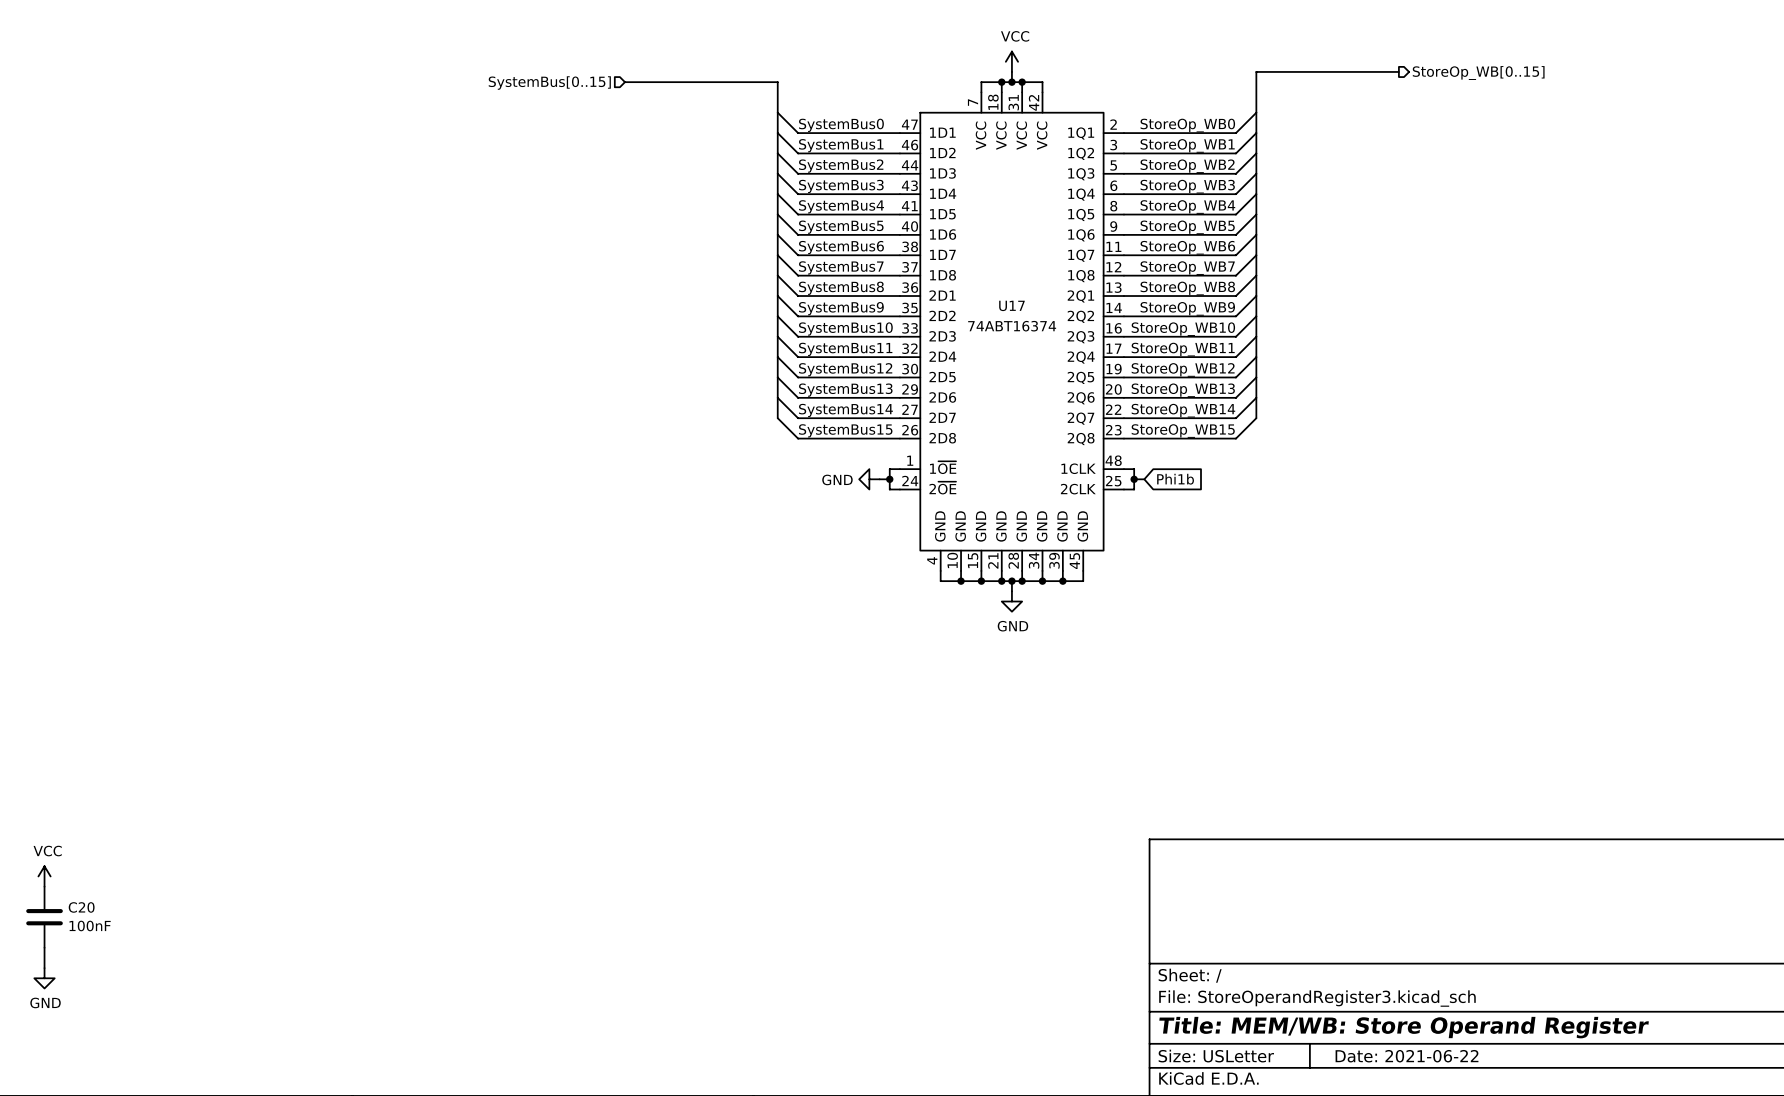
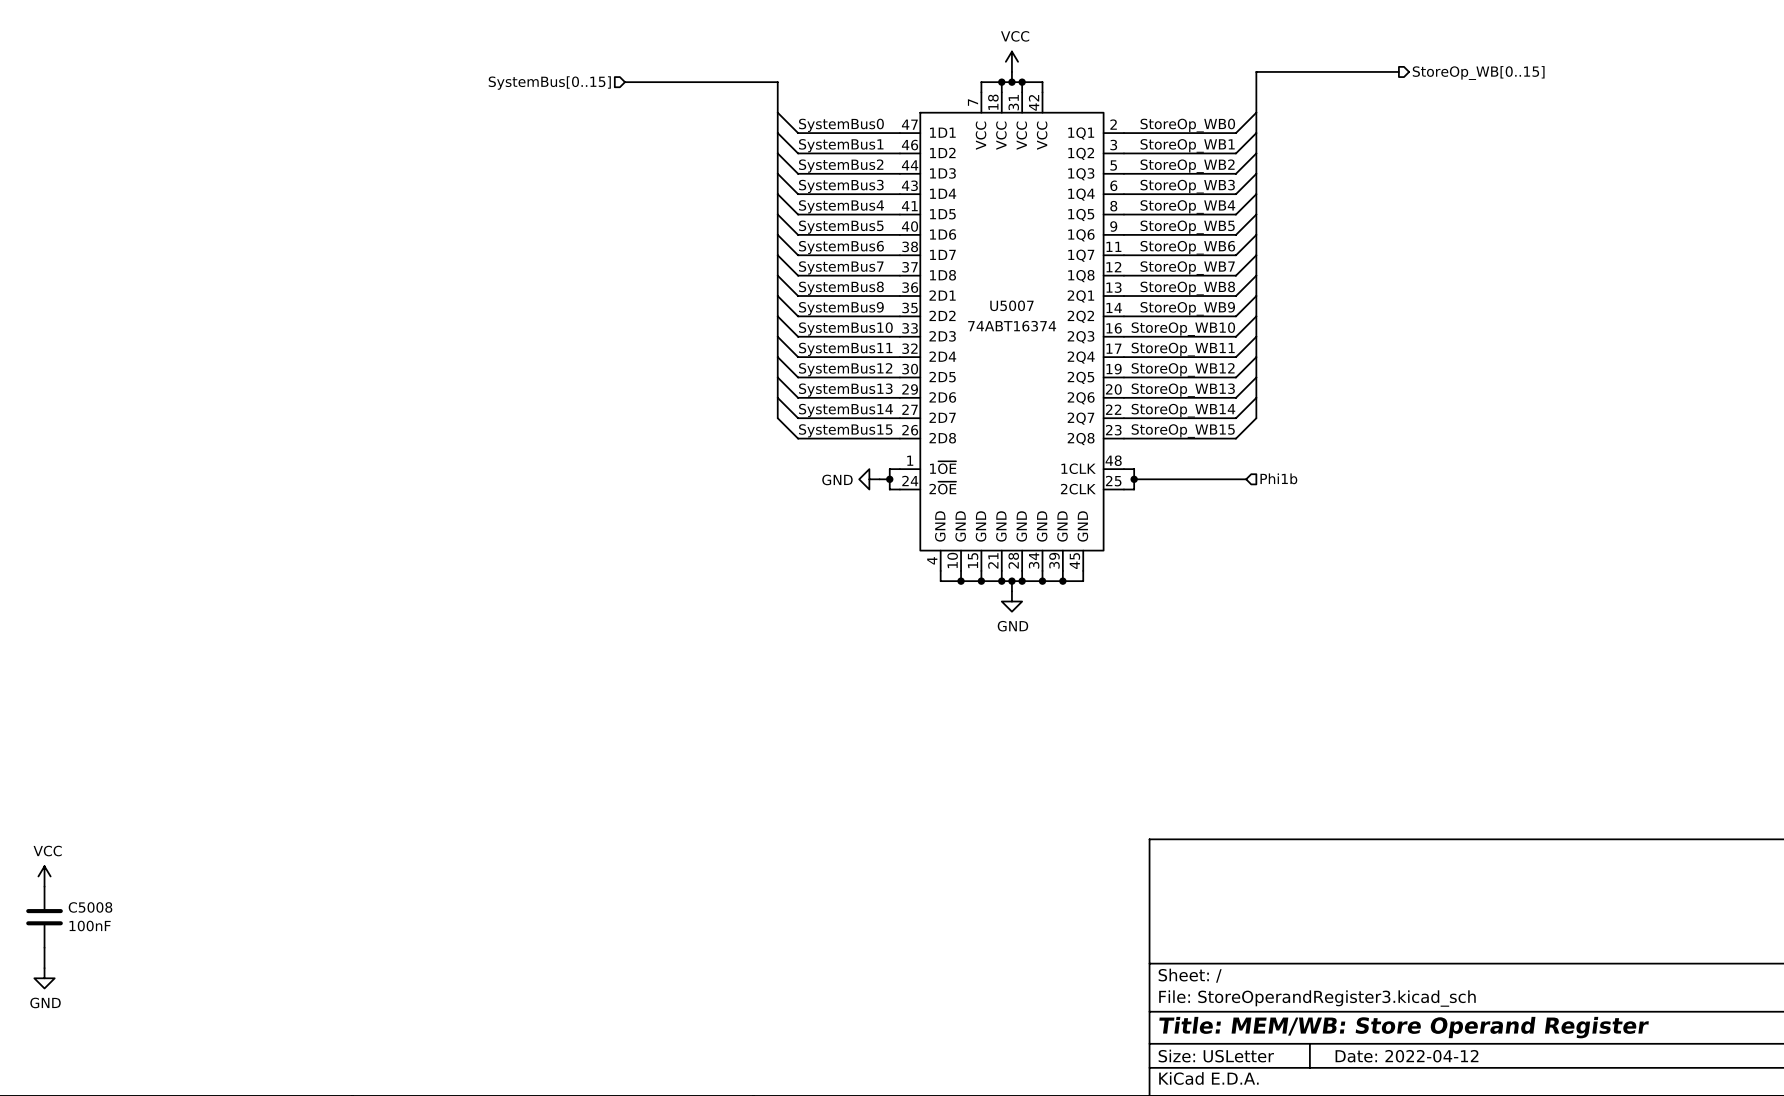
U17 name: U17 (1011, 305) -> U5007 (1011, 305)
hierarchical label: none -> Phi1b (1278, 478)
wire: none -> (1144, 479) (1246, 479)
global label: Phi1b (1175, 479) -> none
C20 name: C20 (81, 907) -> C5008 (90, 907)
title block: Date: 2021-06-22 (1407, 1056) -> Date: 2022-04-12 (1407, 1056)

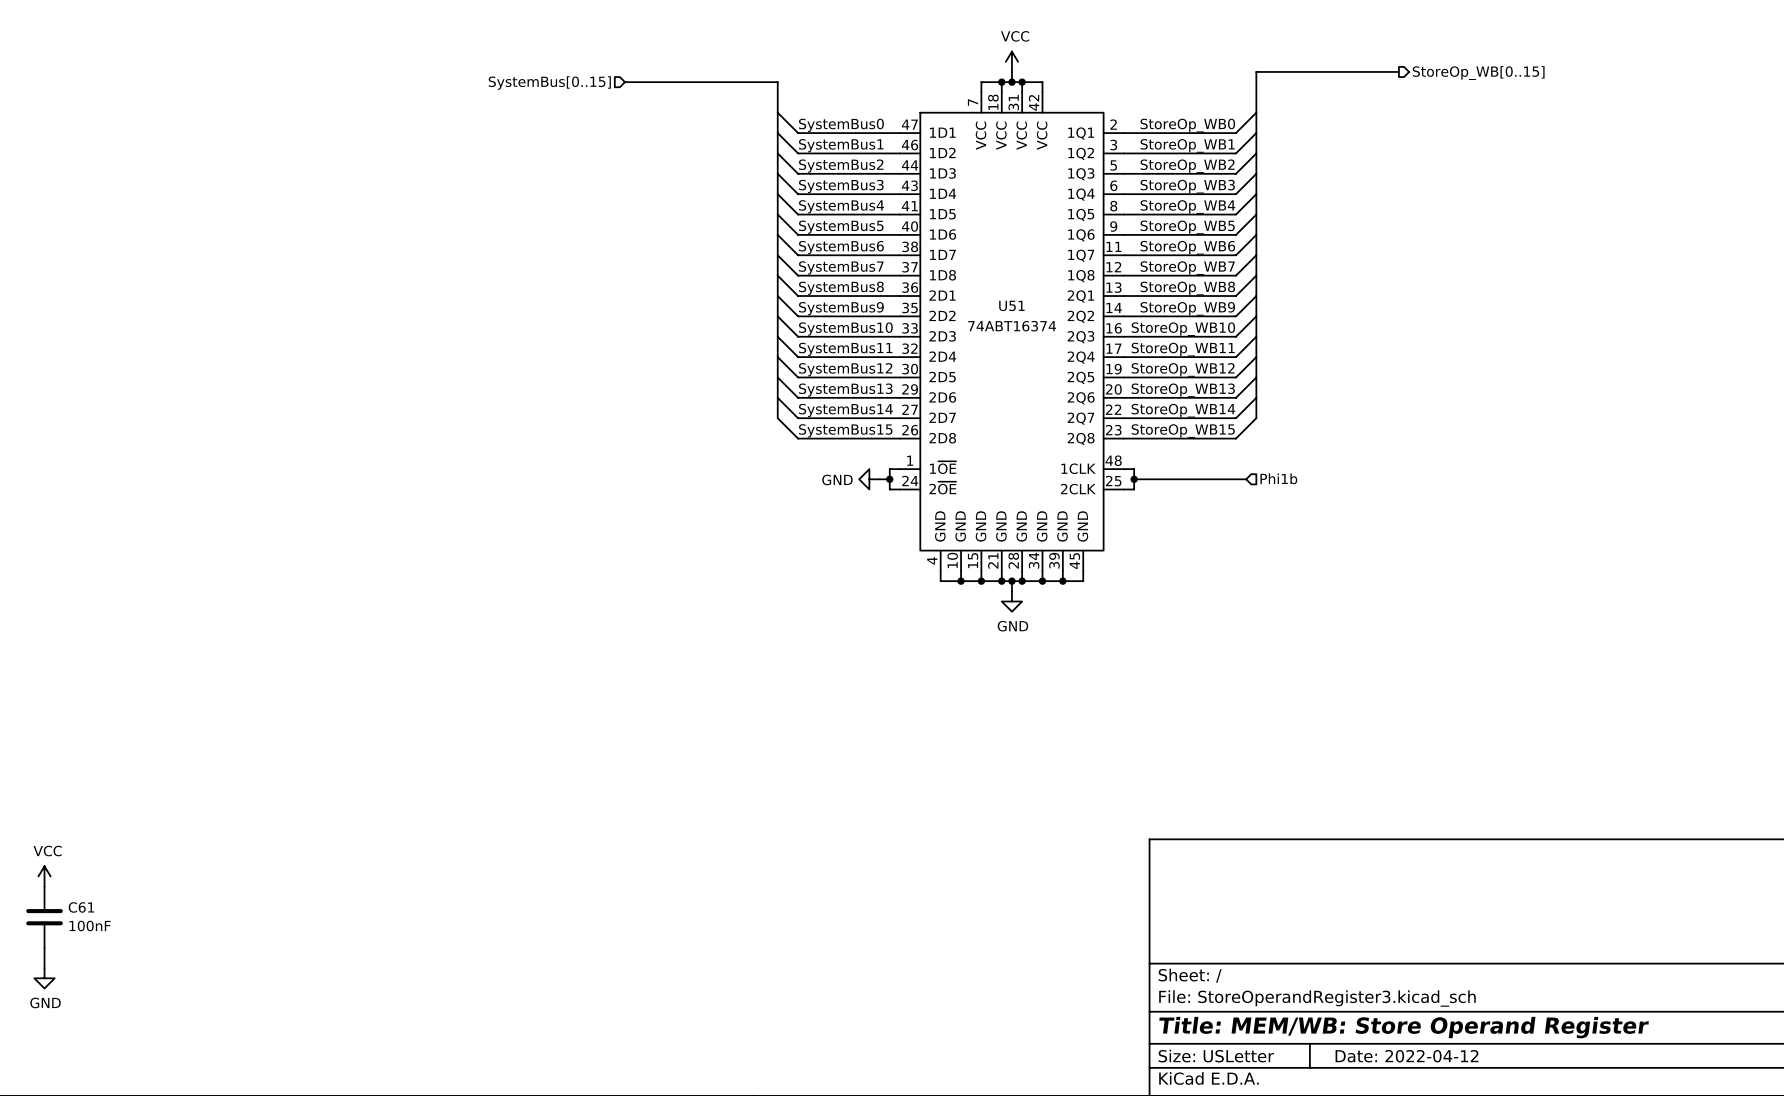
U5007 name: U5007 (1011, 305) -> U51 (1011, 305)
C5008 name: C5008 (90, 907) -> C61 (81, 907)

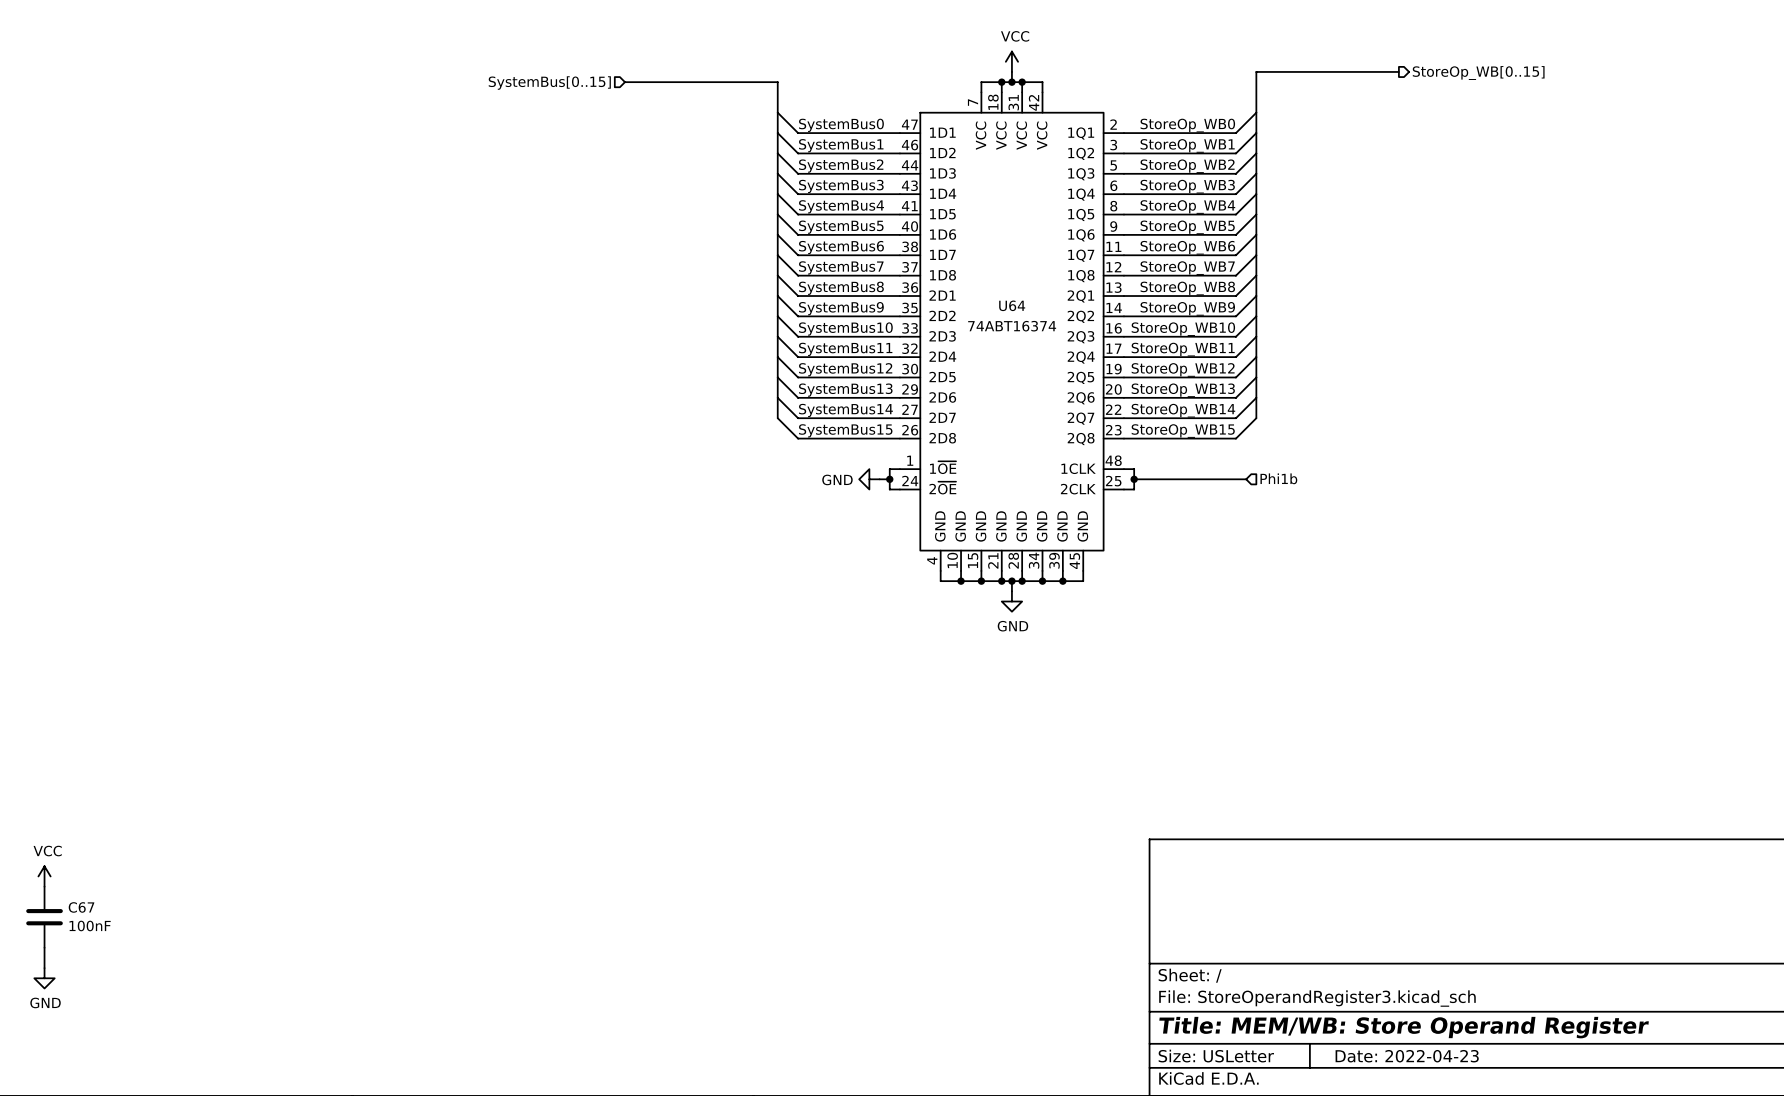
U51 name: U51 (1011, 305) -> U64 (1012, 305)
C61 name: C61 (81, 907) -> C67 (81, 907)
title block: Date: 2022-04-12 (1407, 1056) -> Date: 2022-04-23 (1407, 1056)

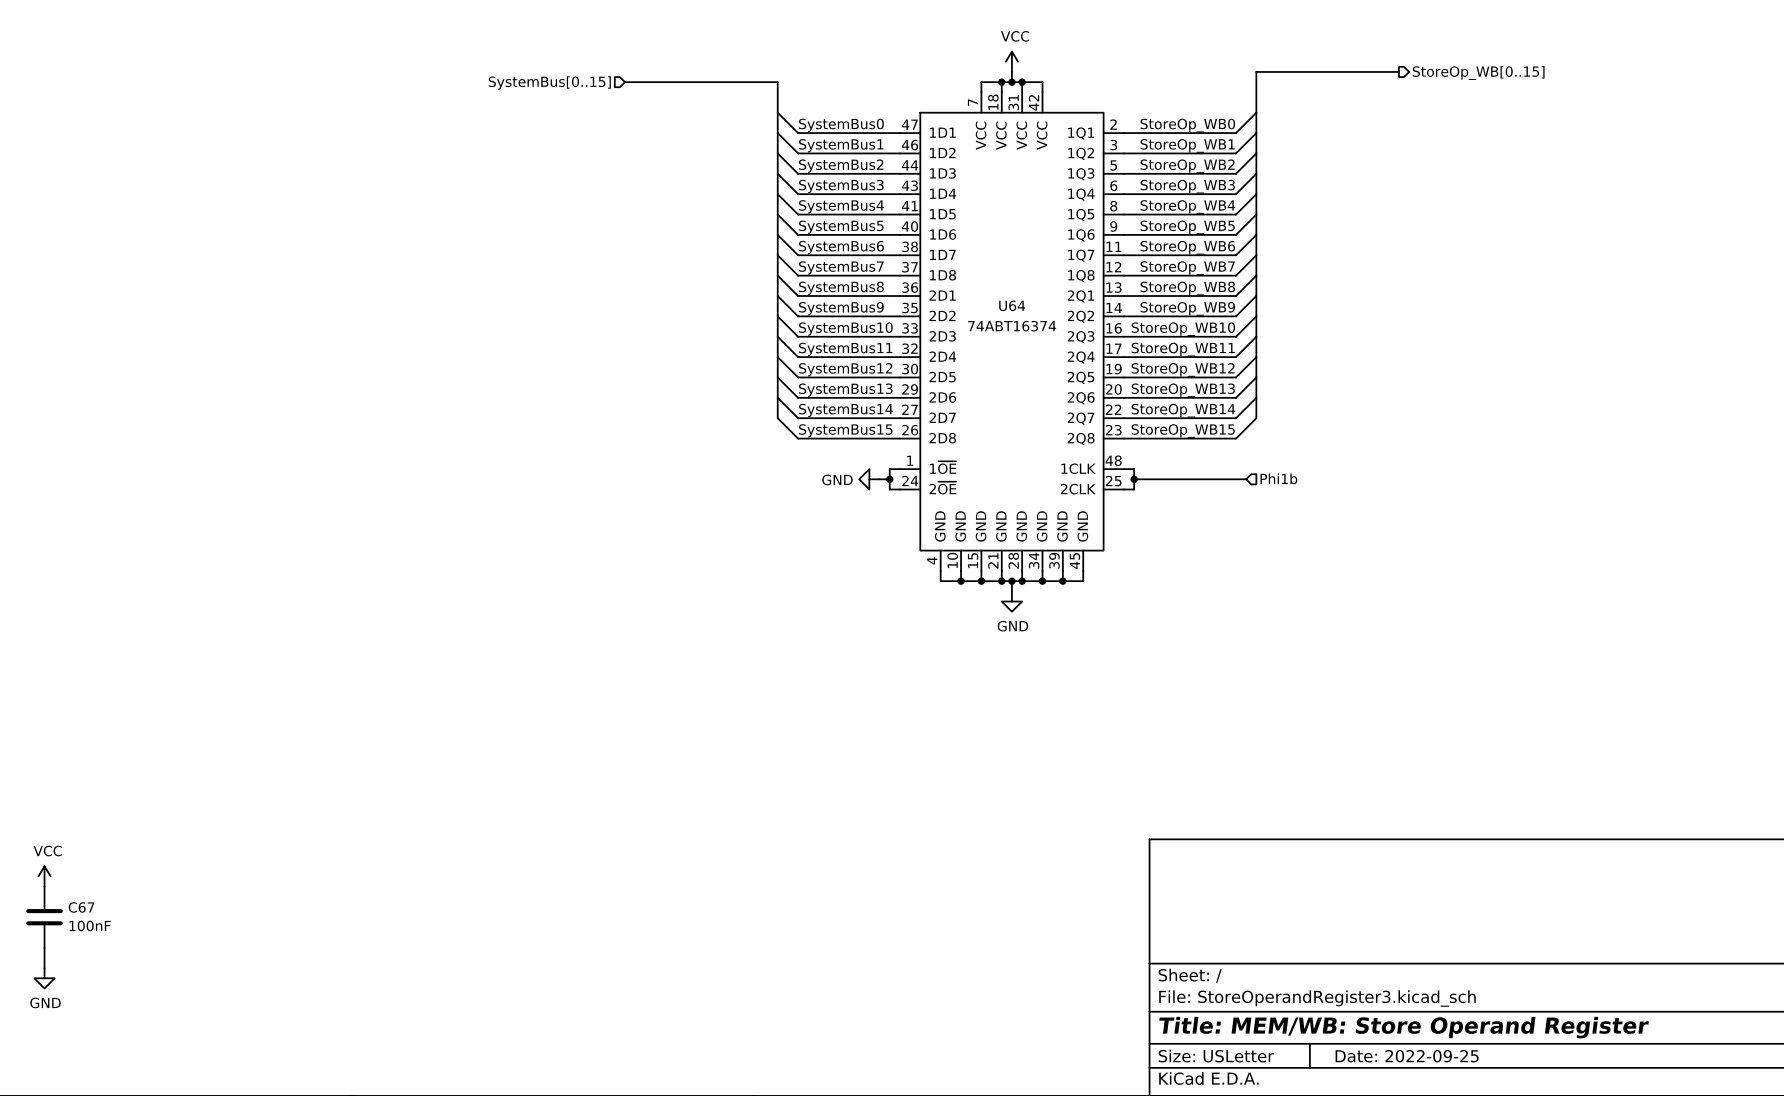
title block: Date: 2022-04-23 (1407, 1056) -> Date: 2022-09-25 (1407, 1056)

